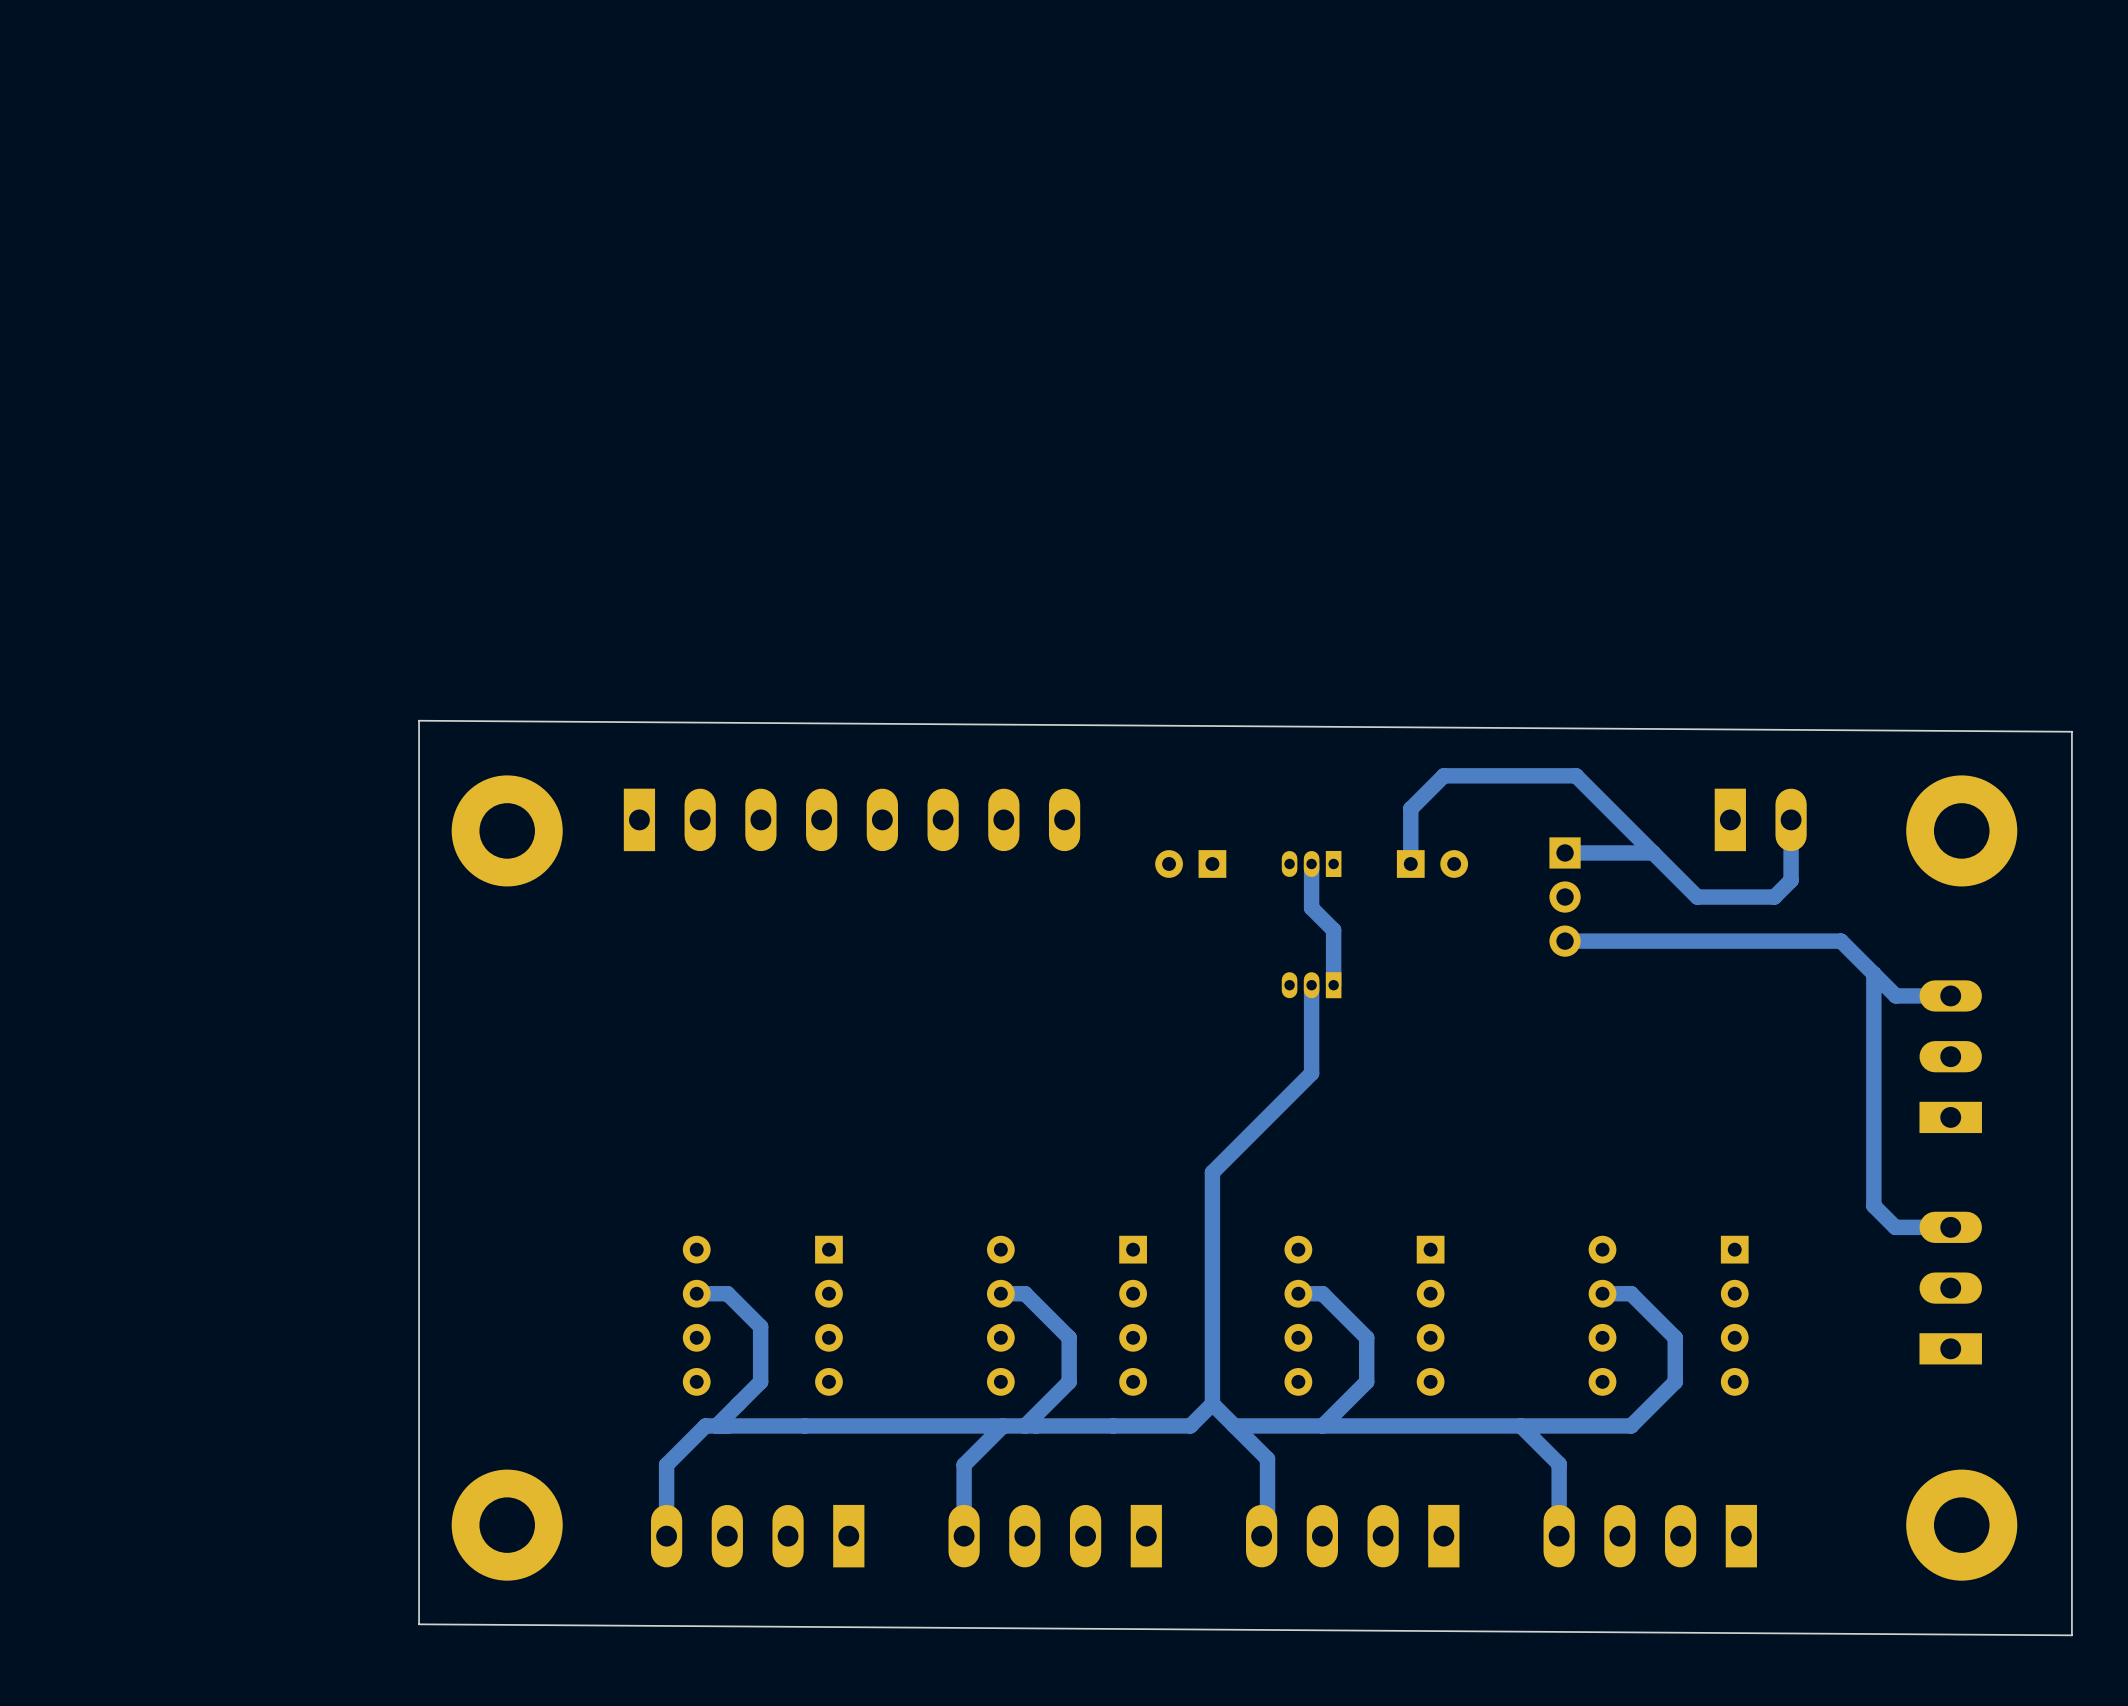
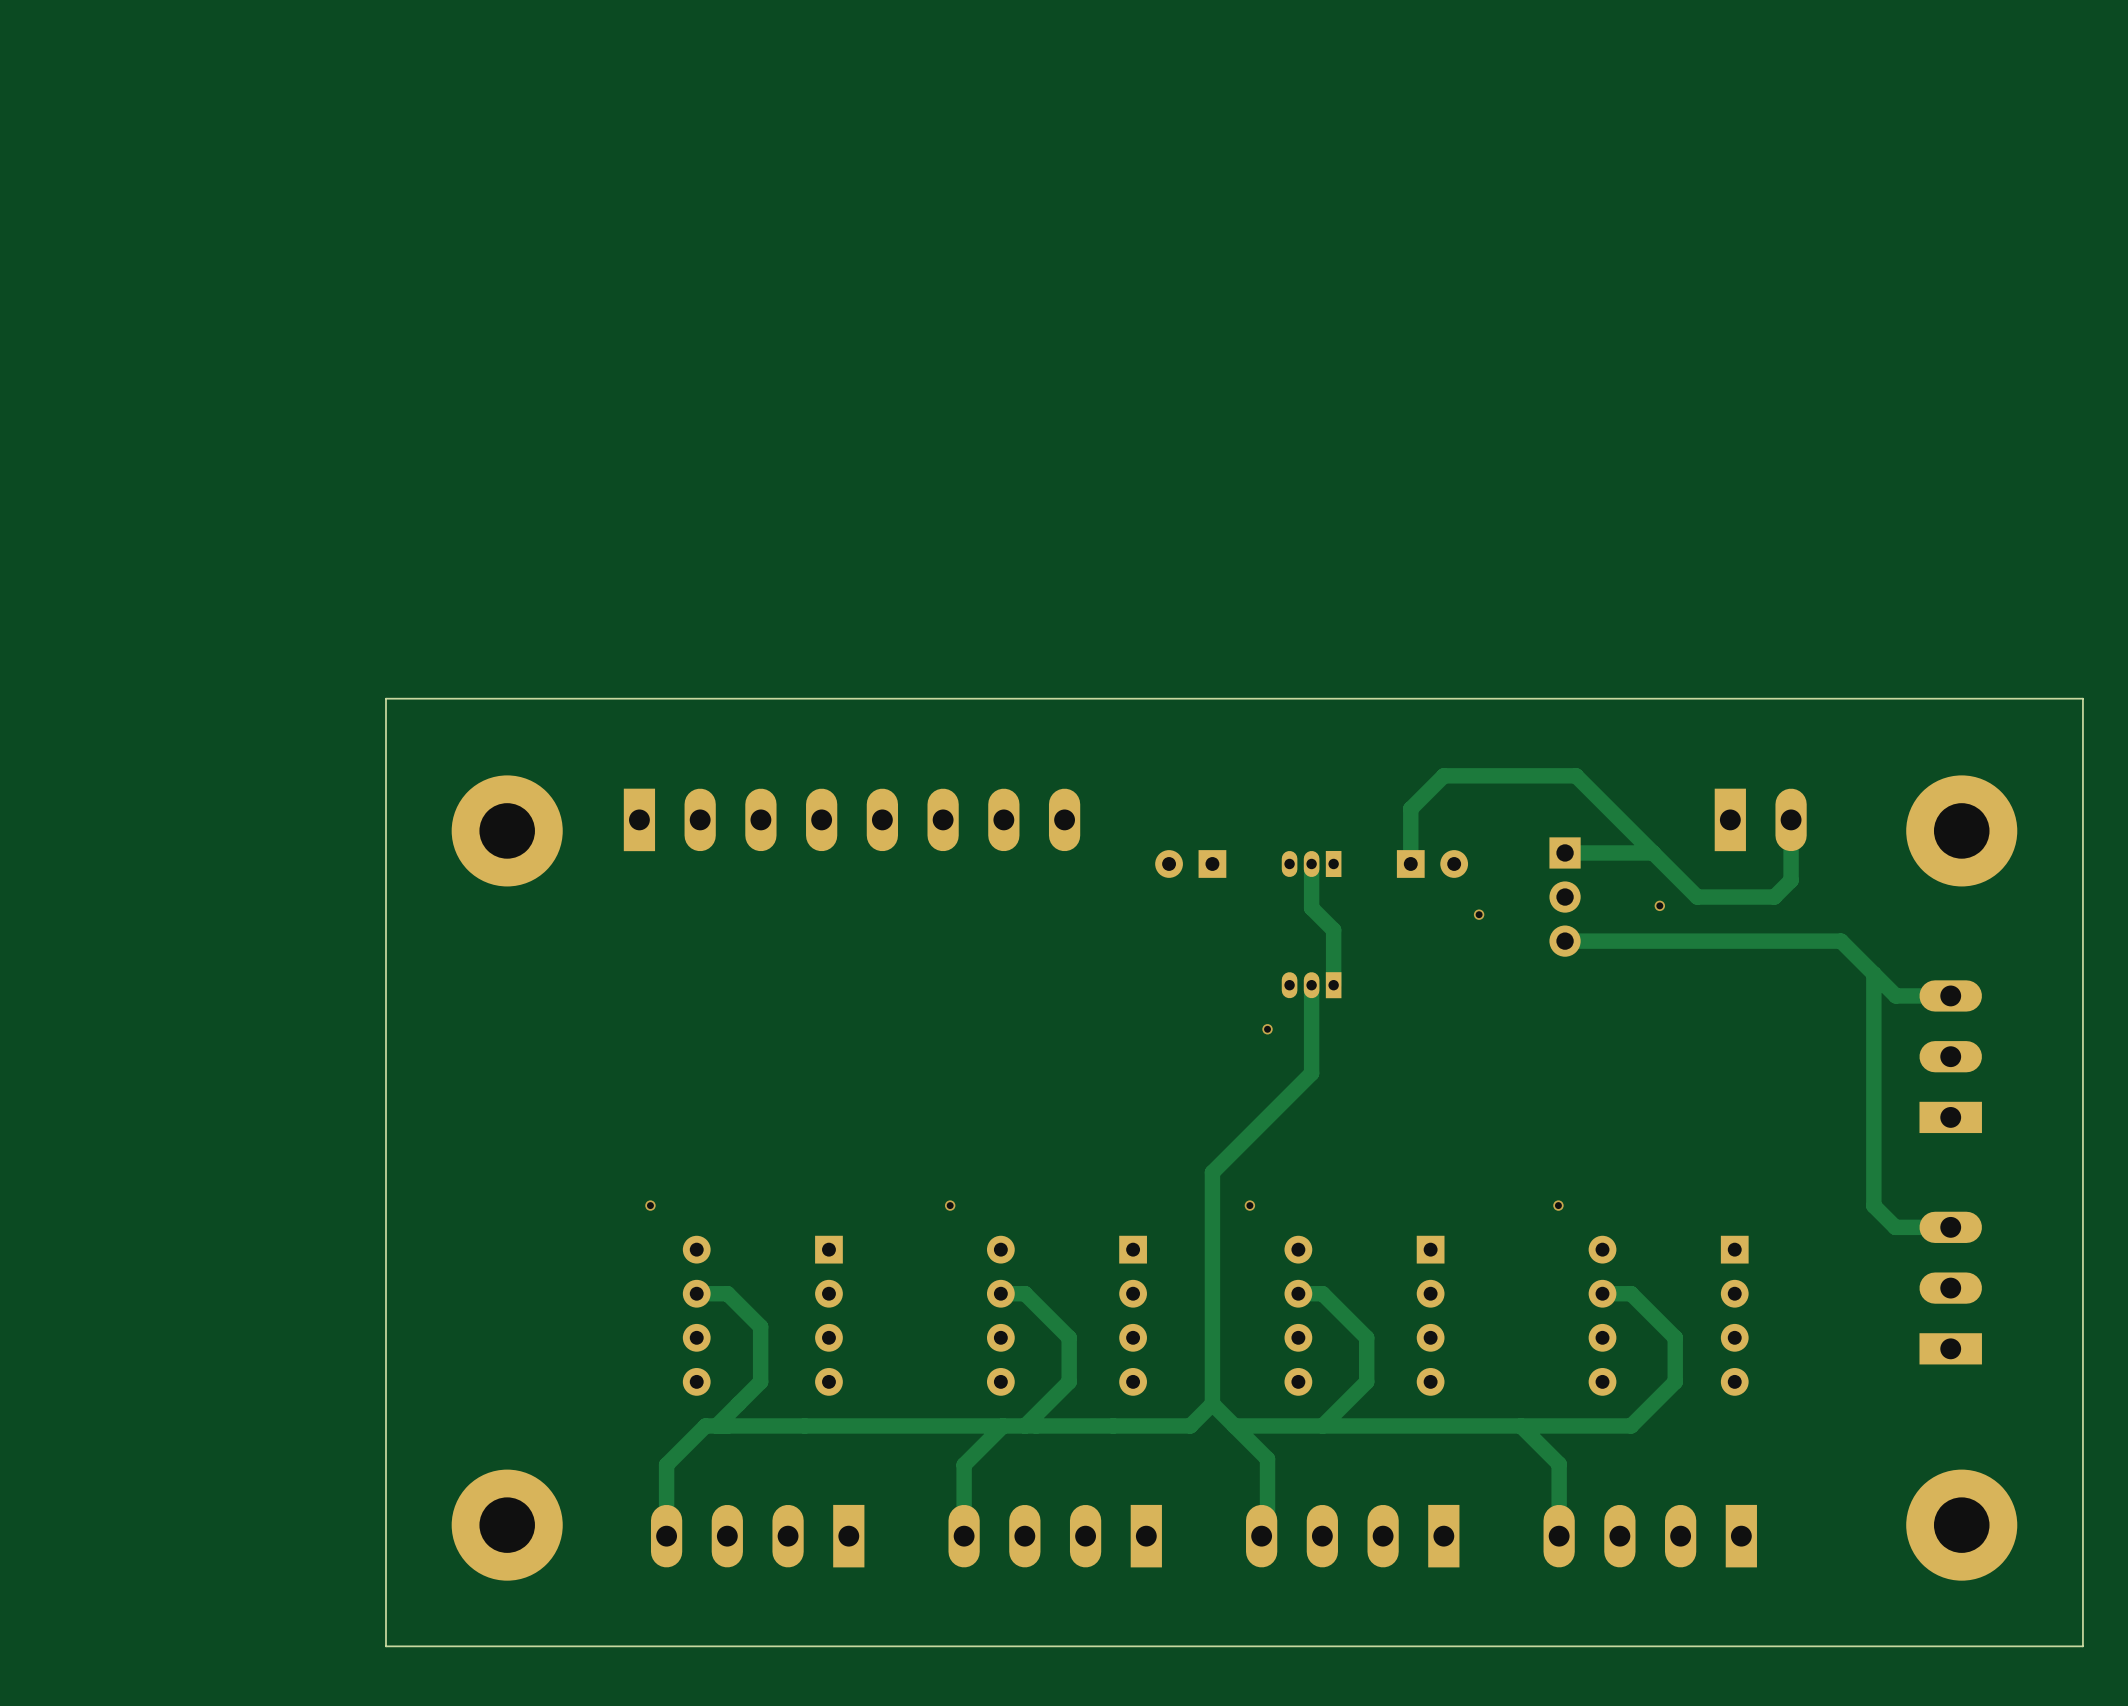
board edge: (419, 720) (2071, 731) (2071, 1635) (419, 1624) (419, 720) -> (2082, 698) (2082, 1646) (385, 1646) (385, 698) (2082, 698)
via: none -> (1659, 905)
via: none -> (1479, 914)
via: none -> (1267, 1029)
via: none -> (650, 1205)
via: none -> (950, 1205)
via: none -> (1249, 1205)
via: none -> (1558, 1205)

